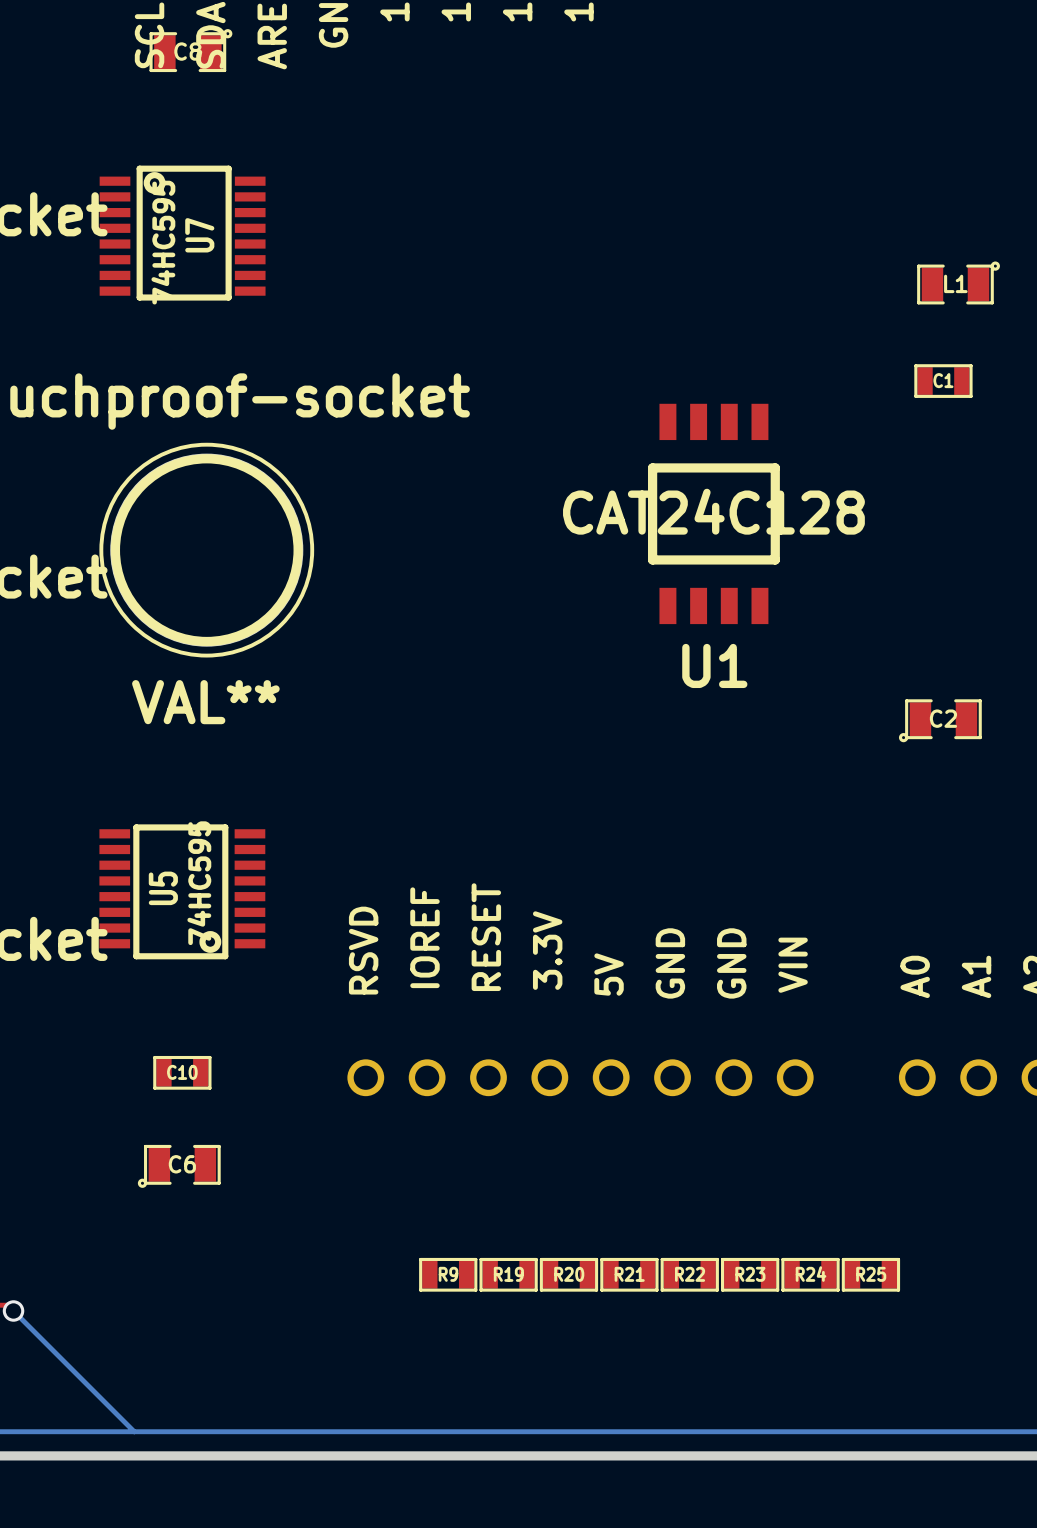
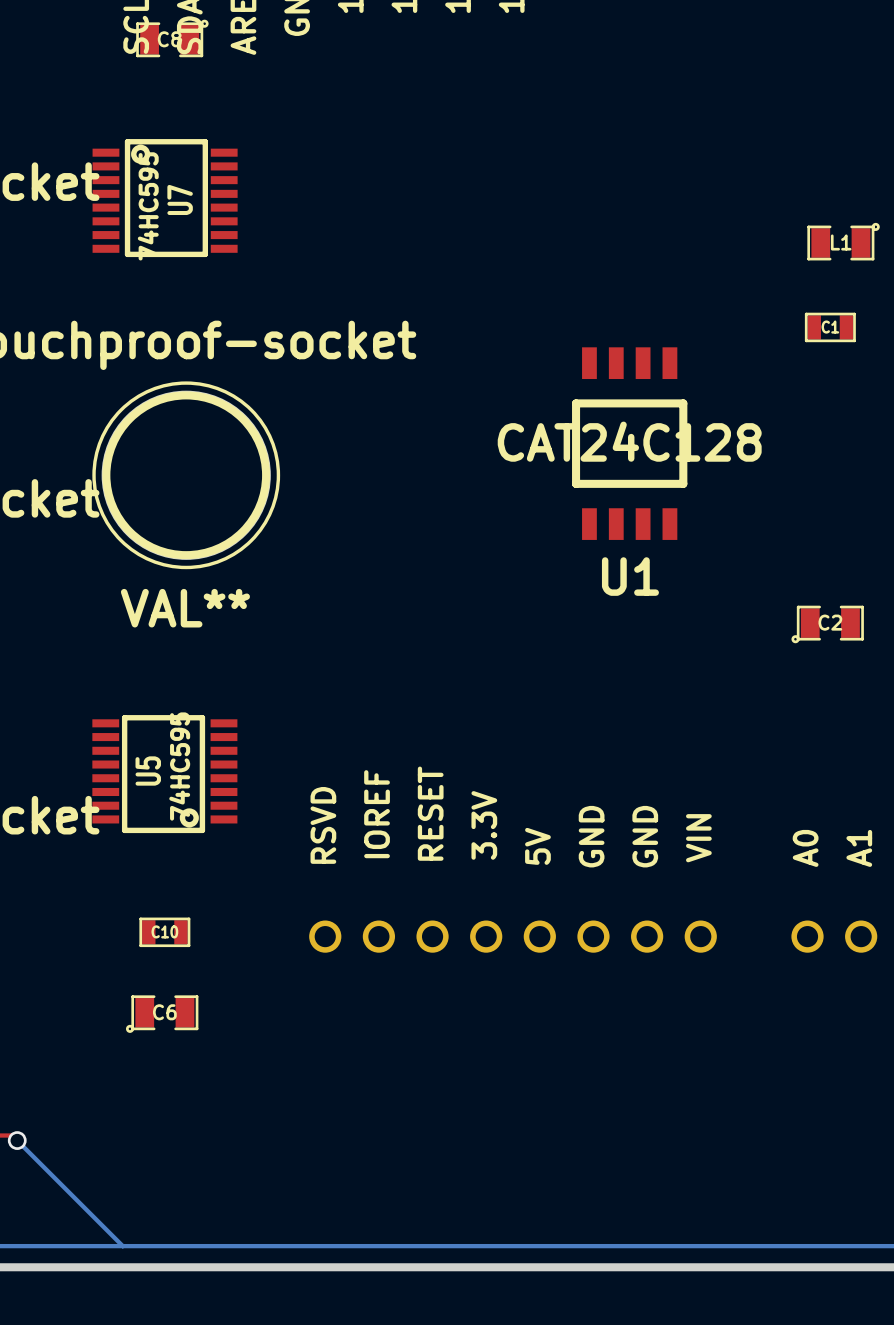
R9: (448, 1274) -> none
R19: (508, 1274) -> none
R20: (568, 1274) -> none
R21: (629, 1274) -> none
R22: (689, 1274) -> none
R23: (750, 1274) -> none
R24: (810, 1274) -> none
R25: (870, 1274) -> none

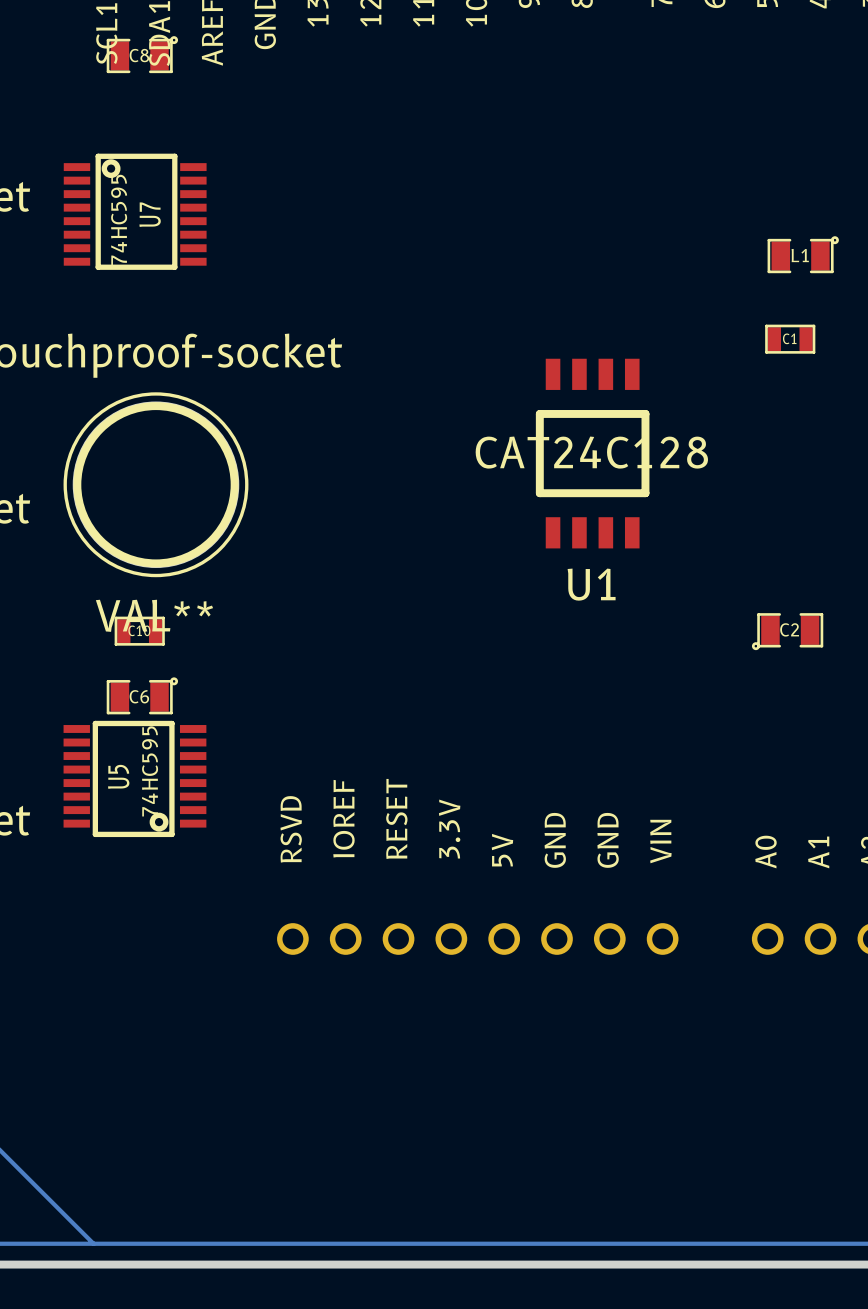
C10 position: (164, 932) -> (139, 631)
C6 rotation: 0° (162, 1014) -> 180° (142, 695)
C6 position: (162, 1014) -> (142, 695)

